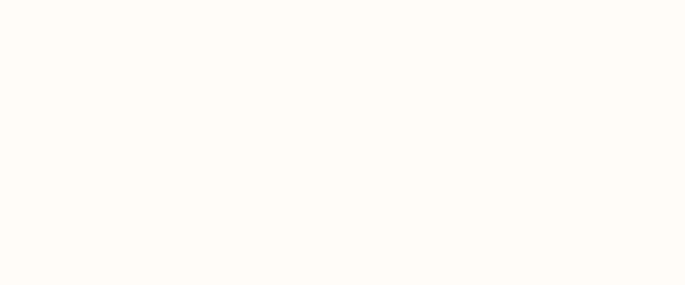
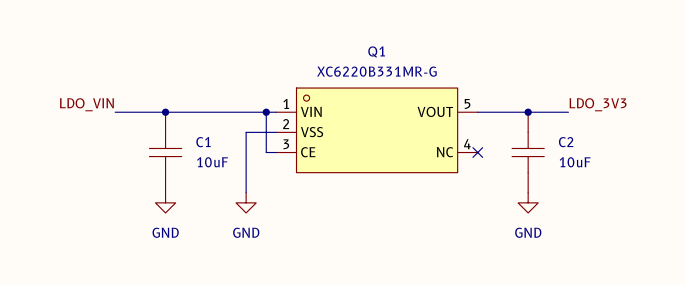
label: none -> LDO_VIN (86, 104)
label: none -> LDO_3V3 (597, 104)
wire: none -> (115, 112) (276, 112)
junction: none -> (165, 112)
wire: none -> (266, 112) (266, 152) (276, 152)
junction: none -> (266, 112)
wire: none -> (477, 112) (568, 112)
junction: none -> (528, 112)
Q1: none -> XC6220B331MR-G (377, 130)
wire: none -> (276, 132) (246, 132) (246, 192)
C1: none -> 10uF (165, 152)
no-connect mark: none -> (477, 152)
C2: none -> 10uF (528, 152)
power symbol: none -> GND (165, 202)
power symbol: none -> GND (246, 202)
power symbol: none -> GND (528, 202)

